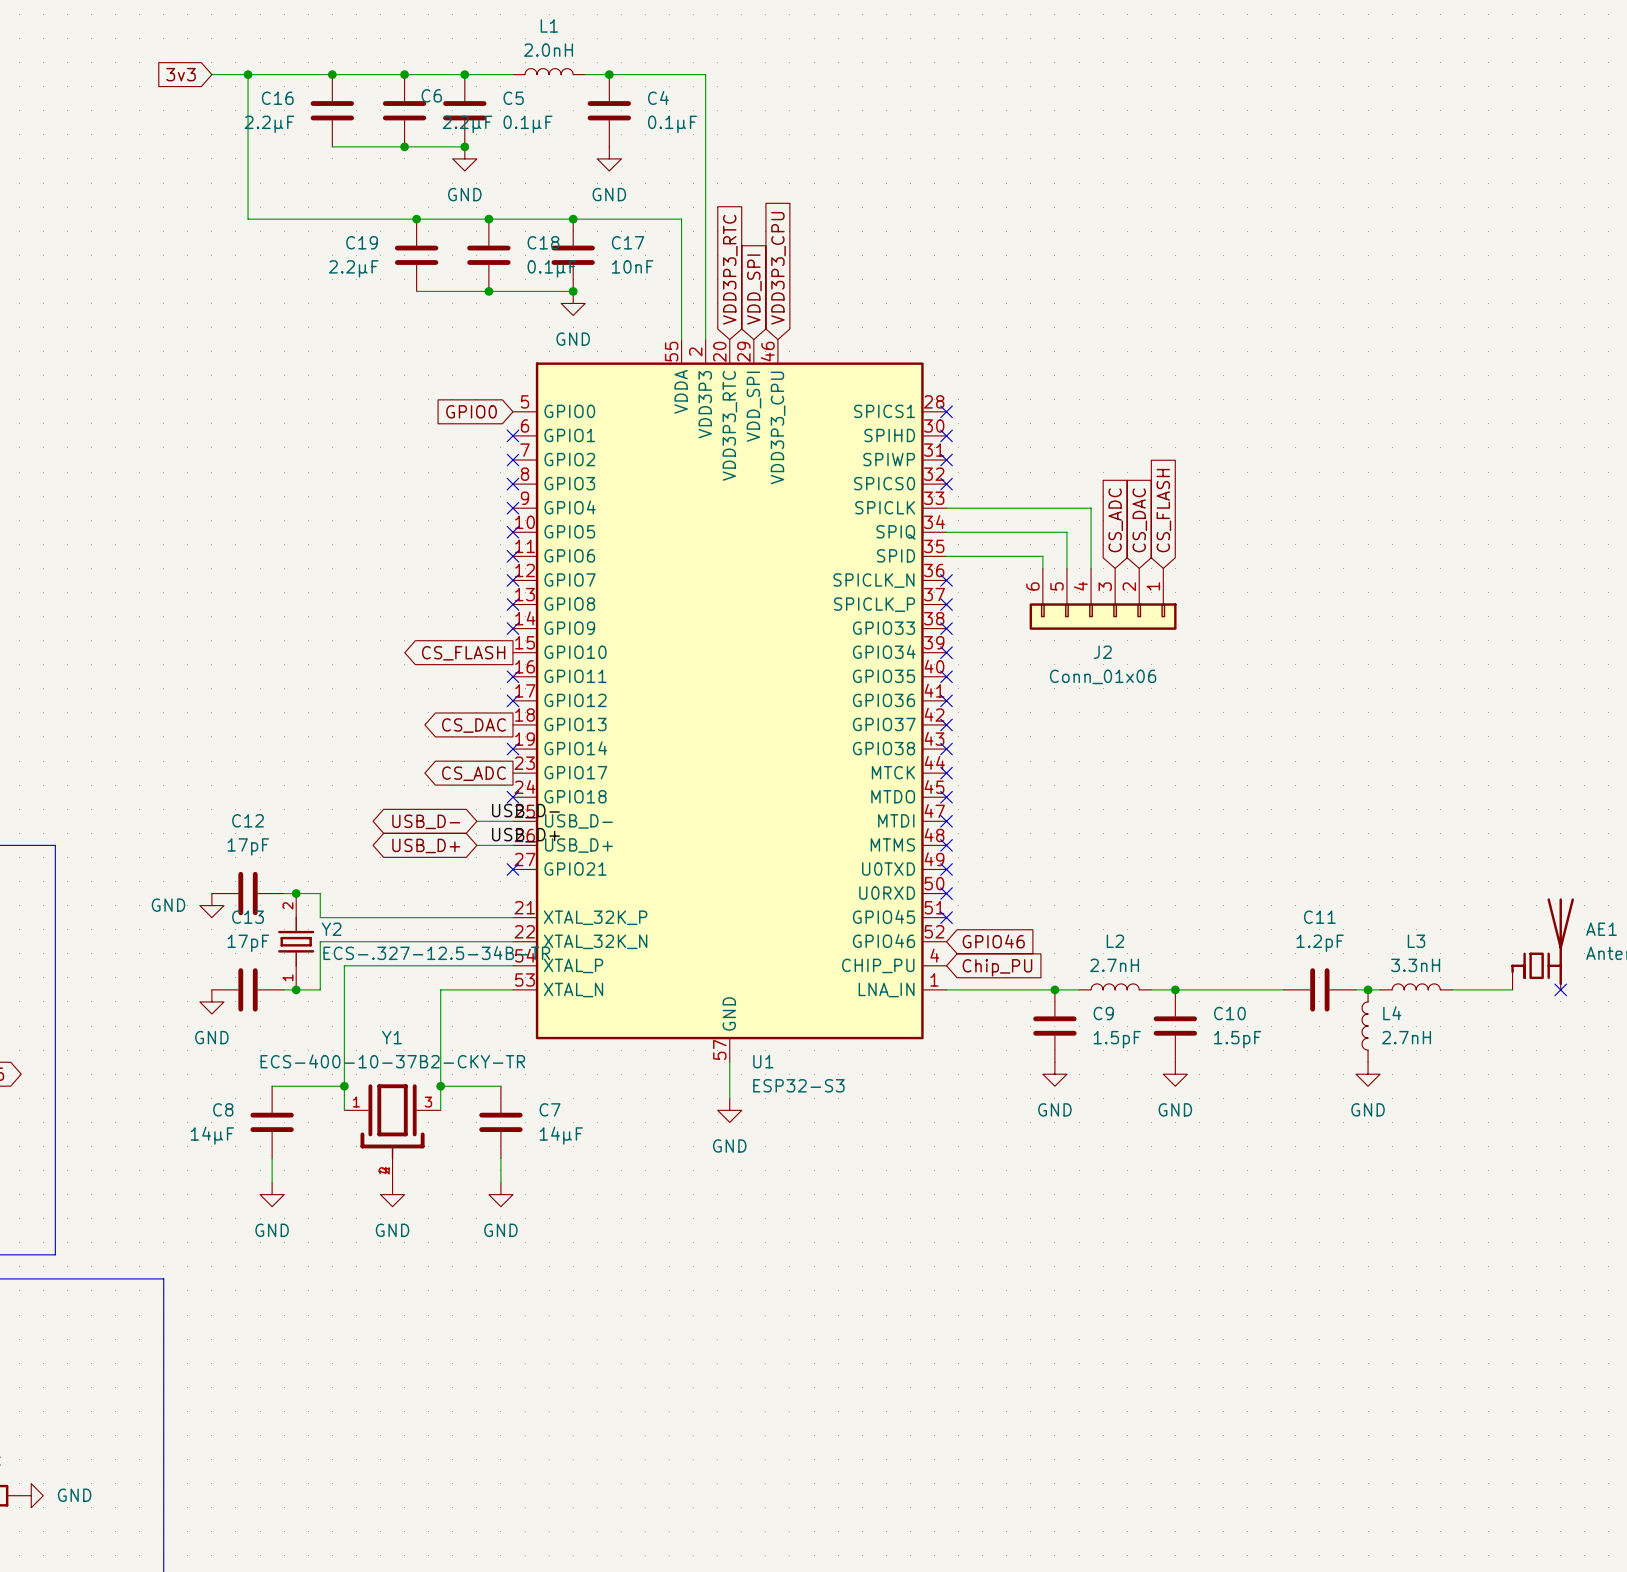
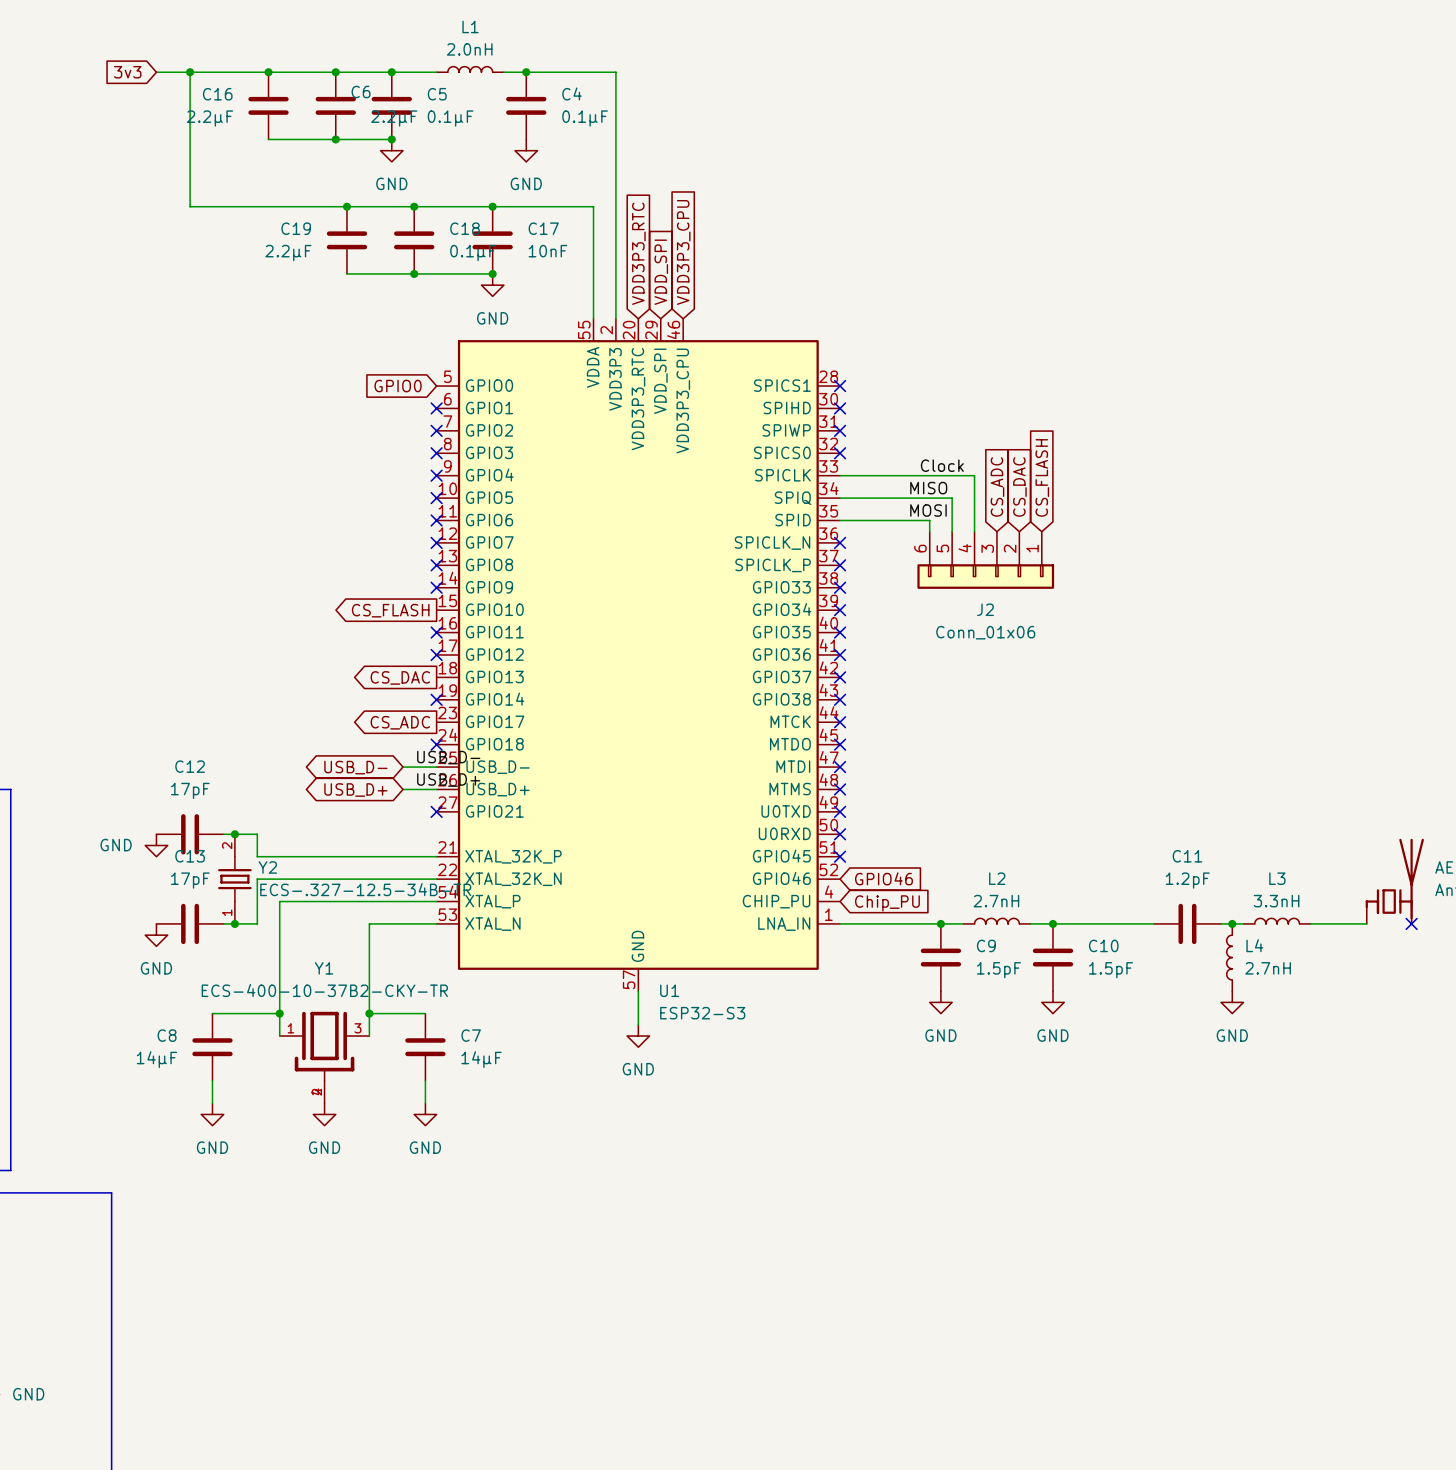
label: none -> Clock (942, 465)
label: none -> MISO (928, 488)
label: none -> MOSI (928, 510)

